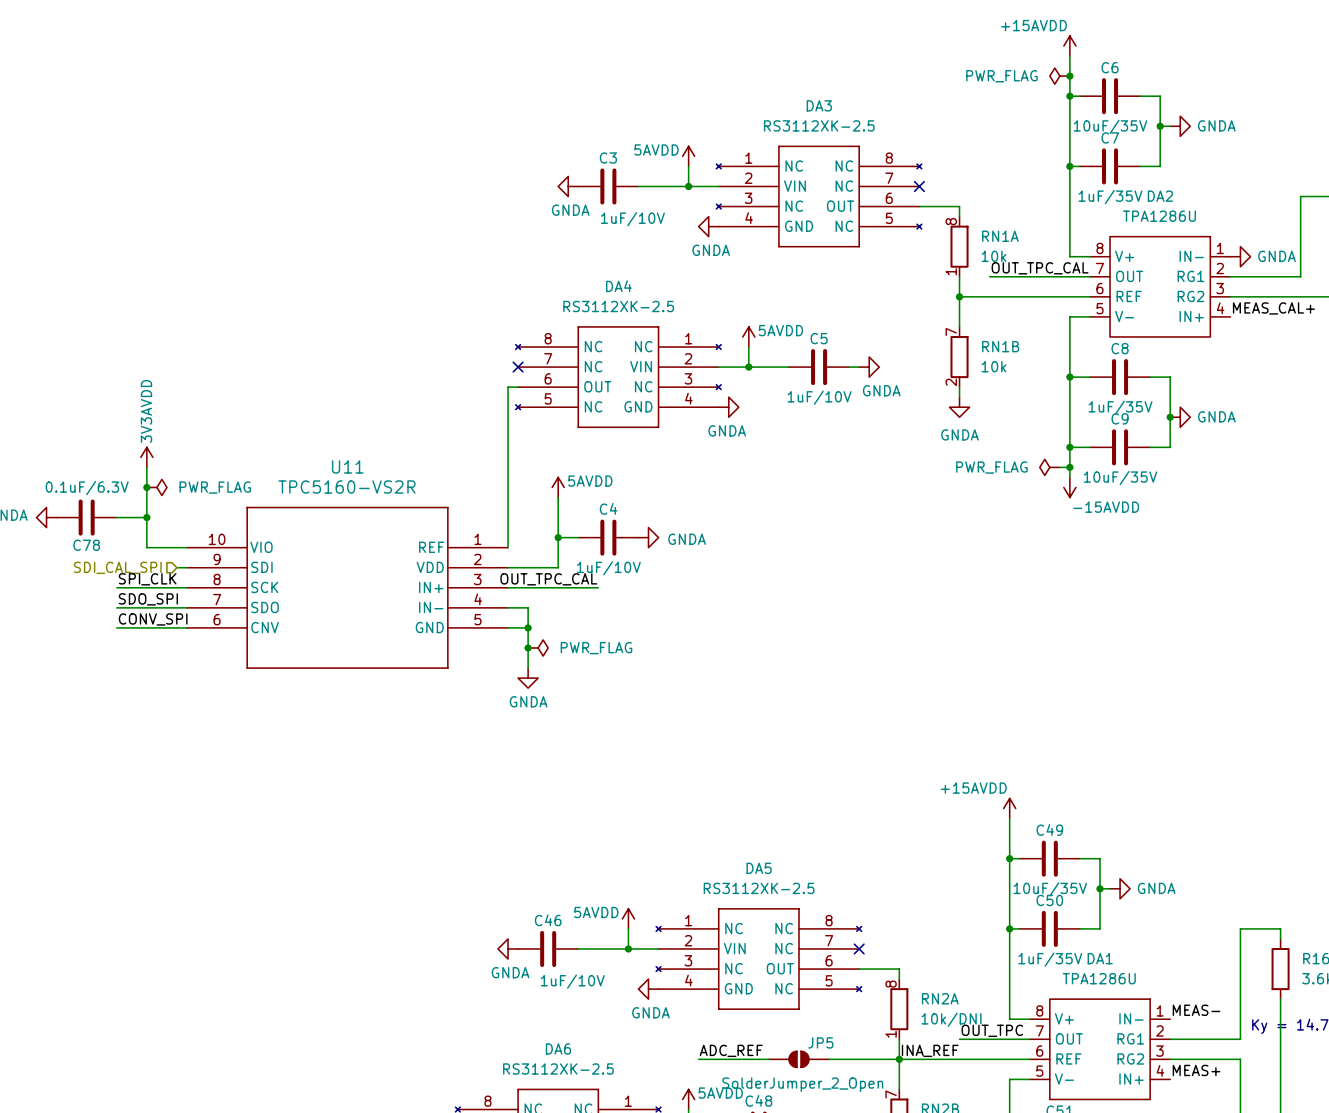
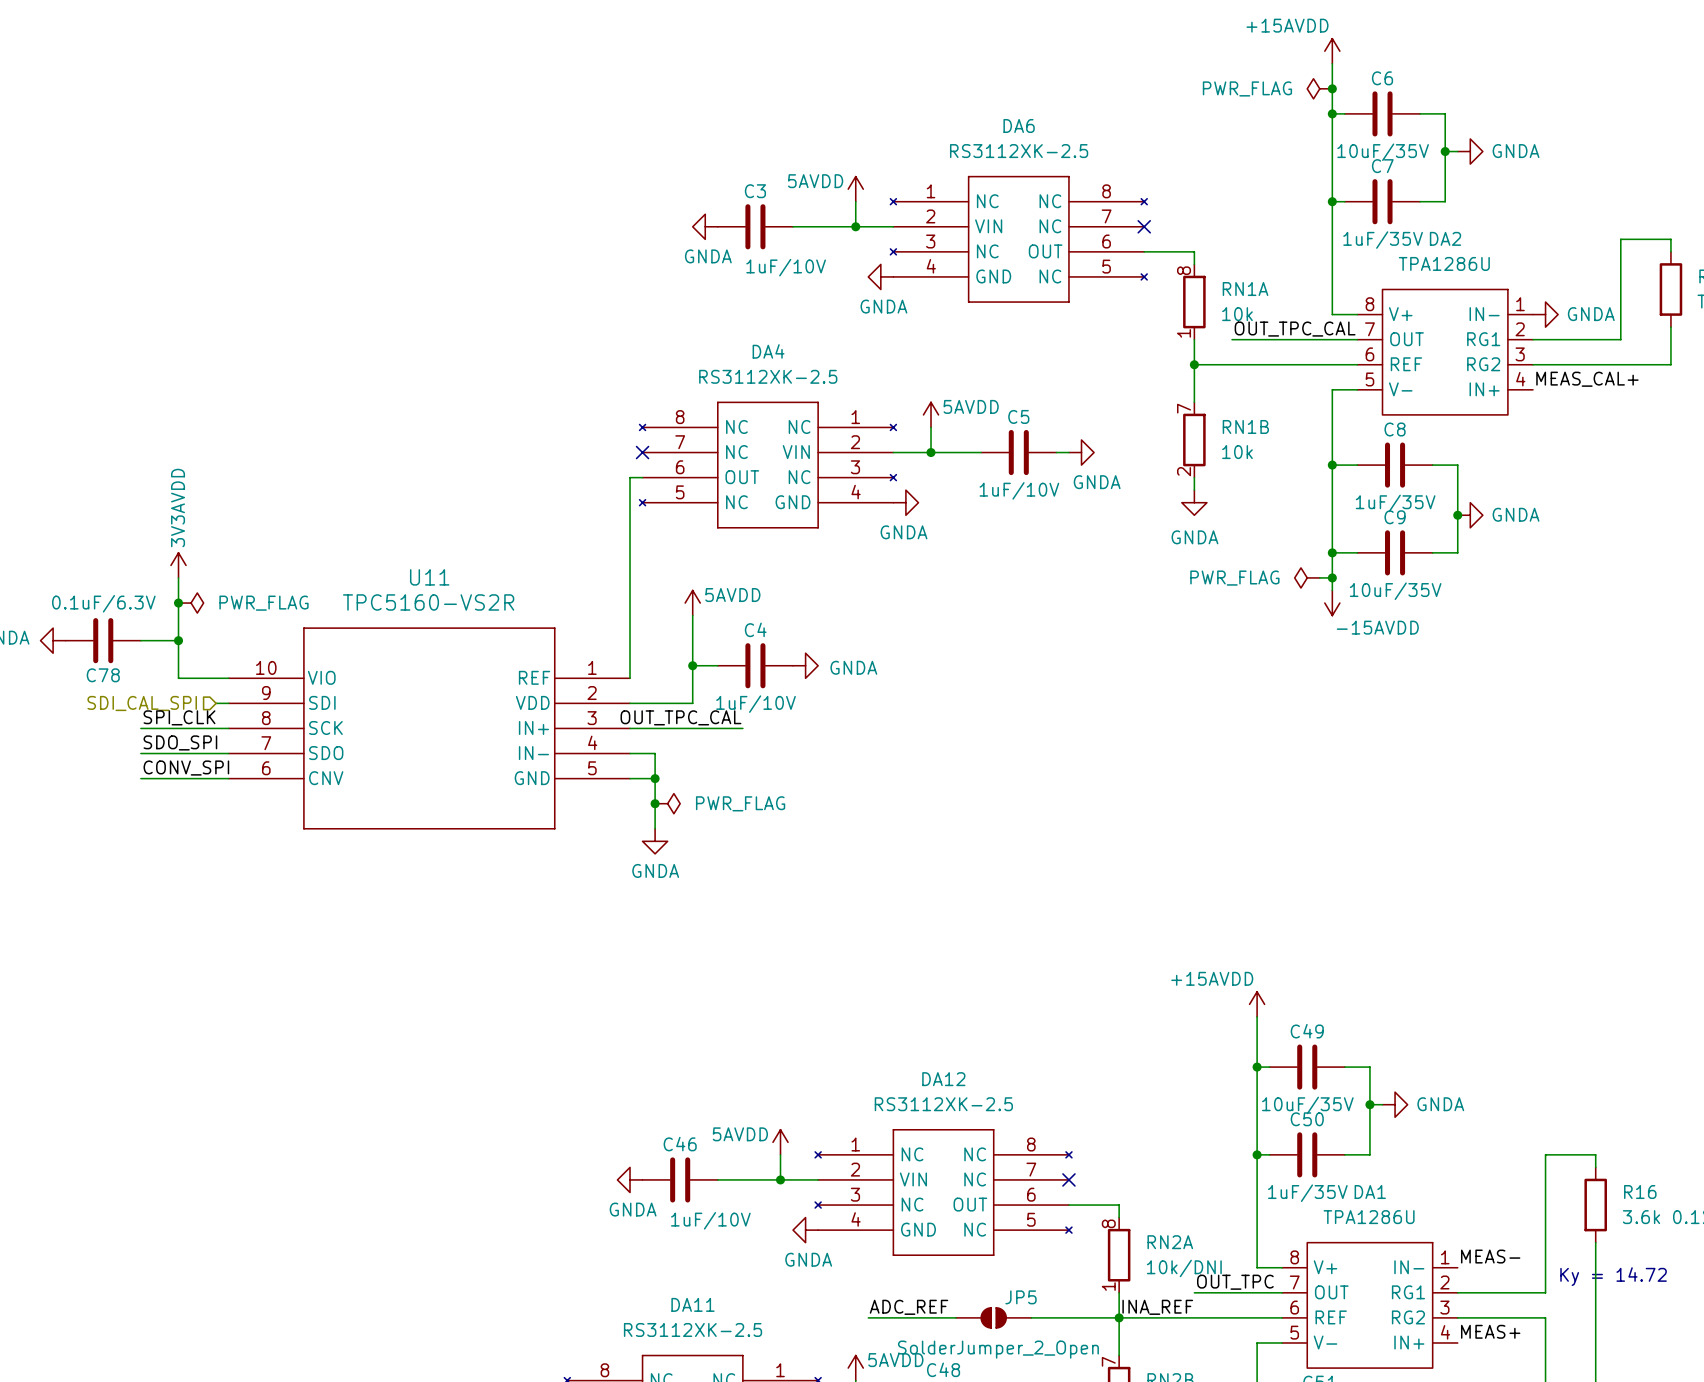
DA3 name: DA3 (819, 105) -> DA6 (1019, 125)
DA5 name: DA5 (759, 868) -> DA12 (943, 1079)
DA6 name: DA6 (558, 1048) -> DA11 (693, 1304)

